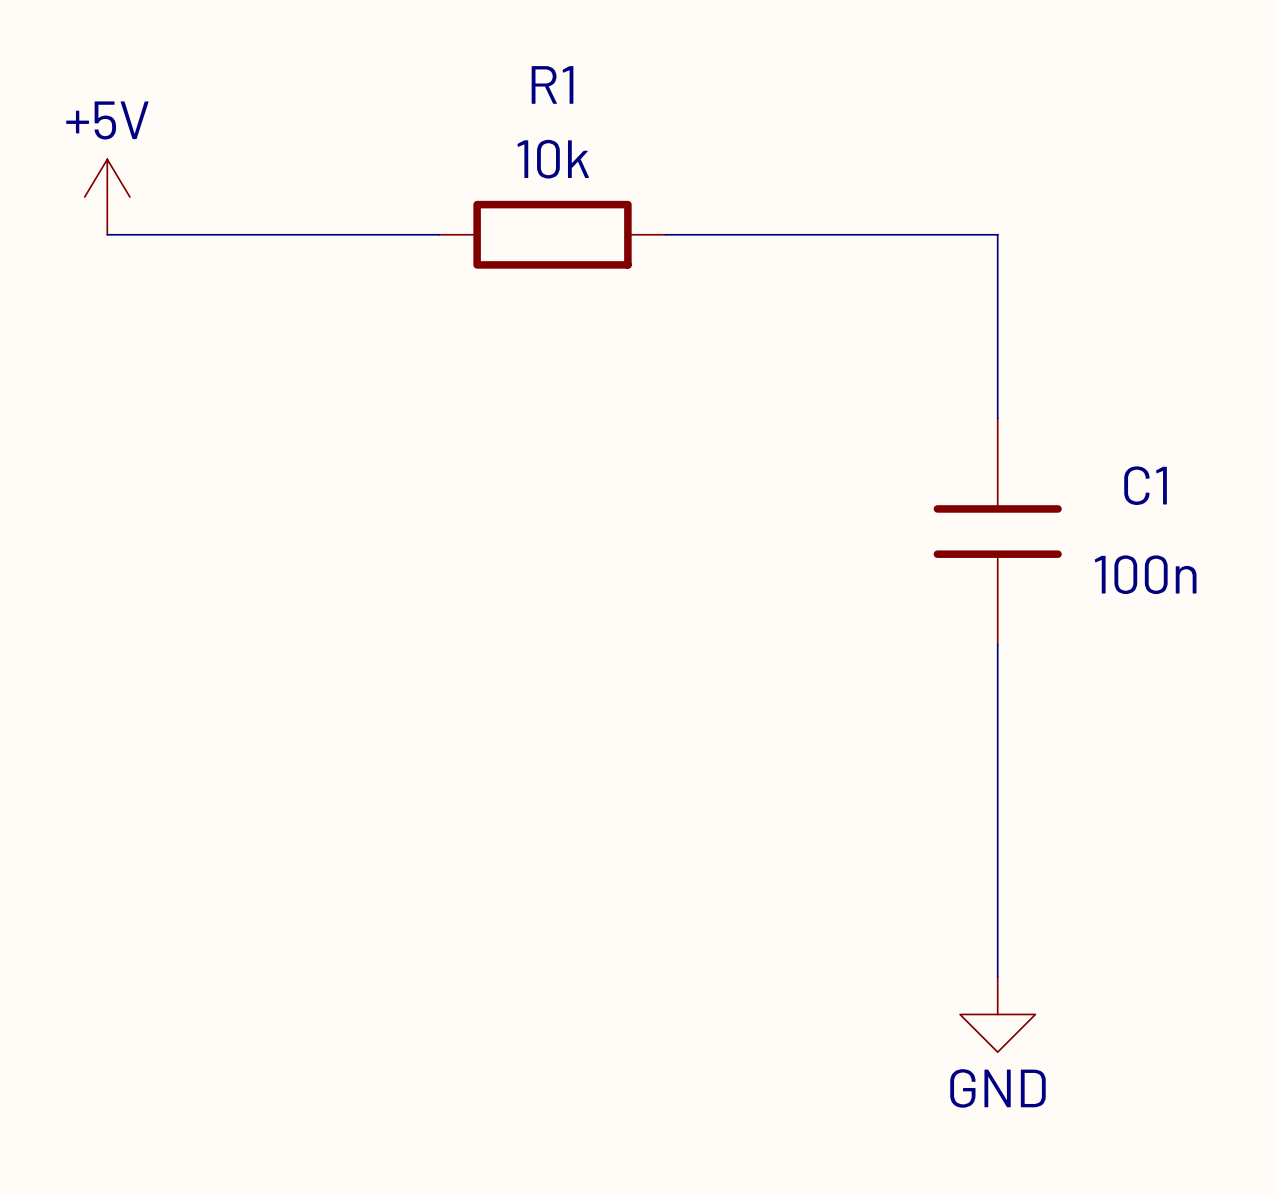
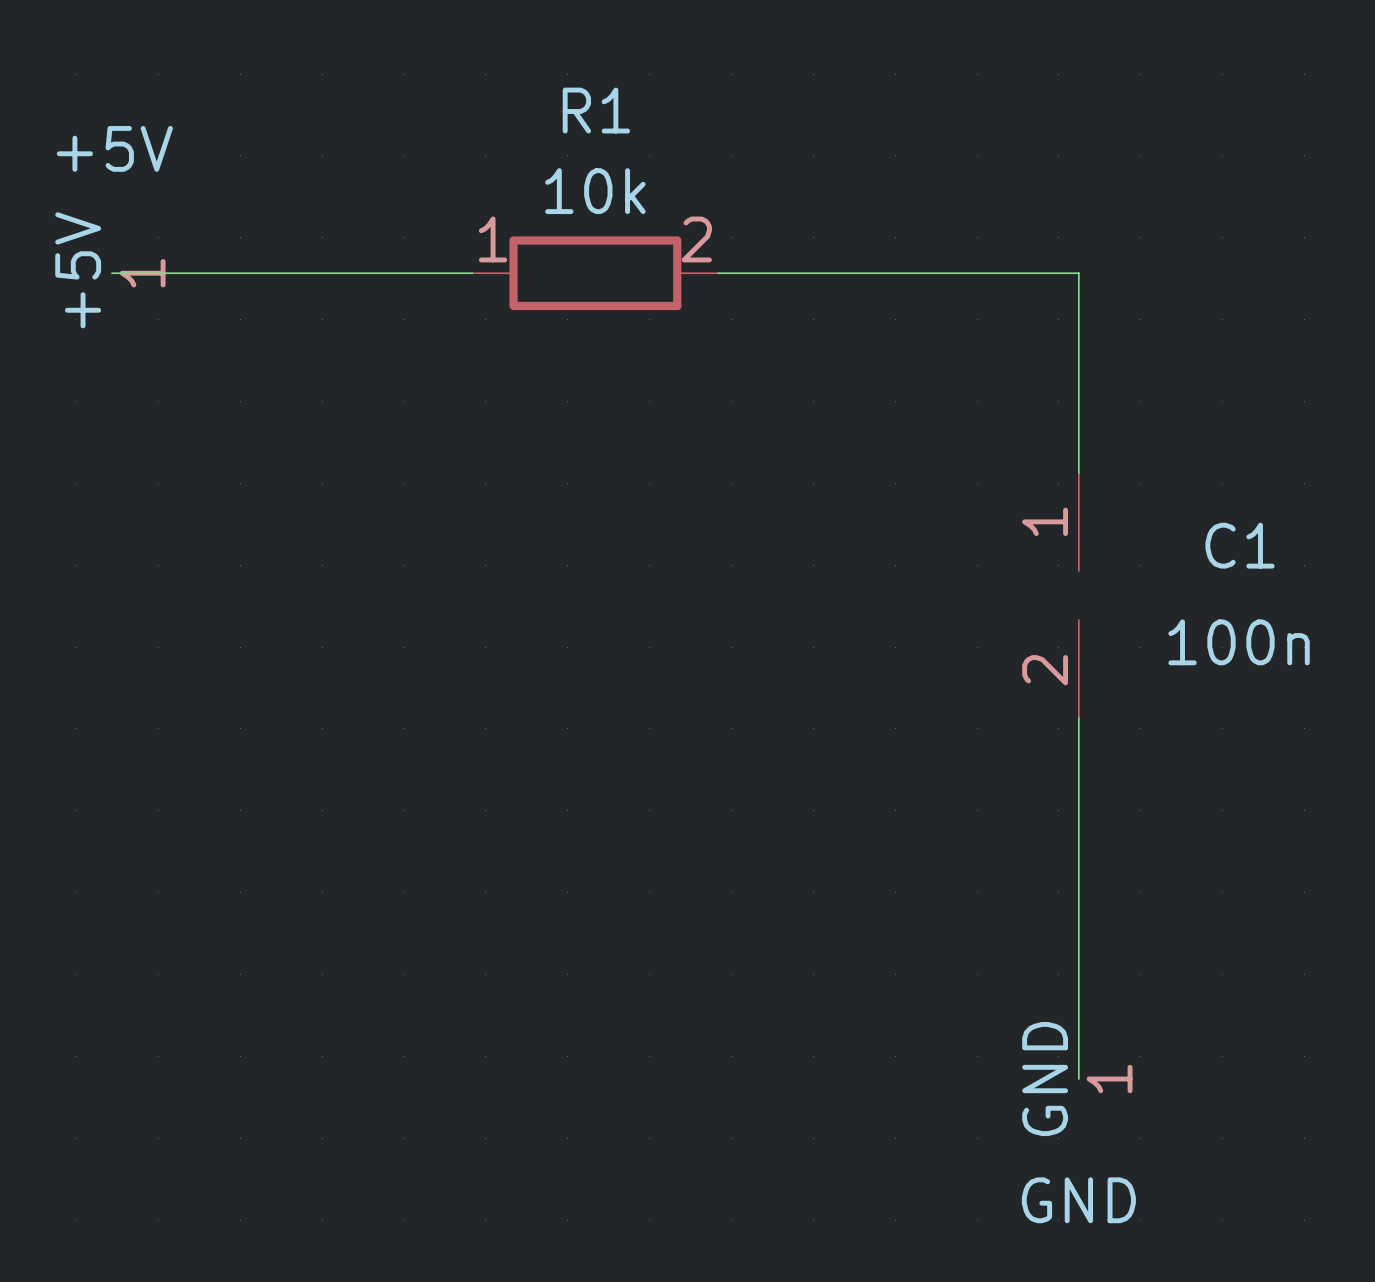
power symbol shape: [84, 159, 130, 235] -> [55, 125, 173, 329]
R1 pin number: none -> 1 (493, 239)
R1 pin number: none -> 2 (696, 239)
C1 symbol: [933, 418, 1062, 645] -> [1078, 472, 1079, 719]
power symbol shape: [960, 976, 1036, 1053] -> [1021, 1021, 1136, 1224]

